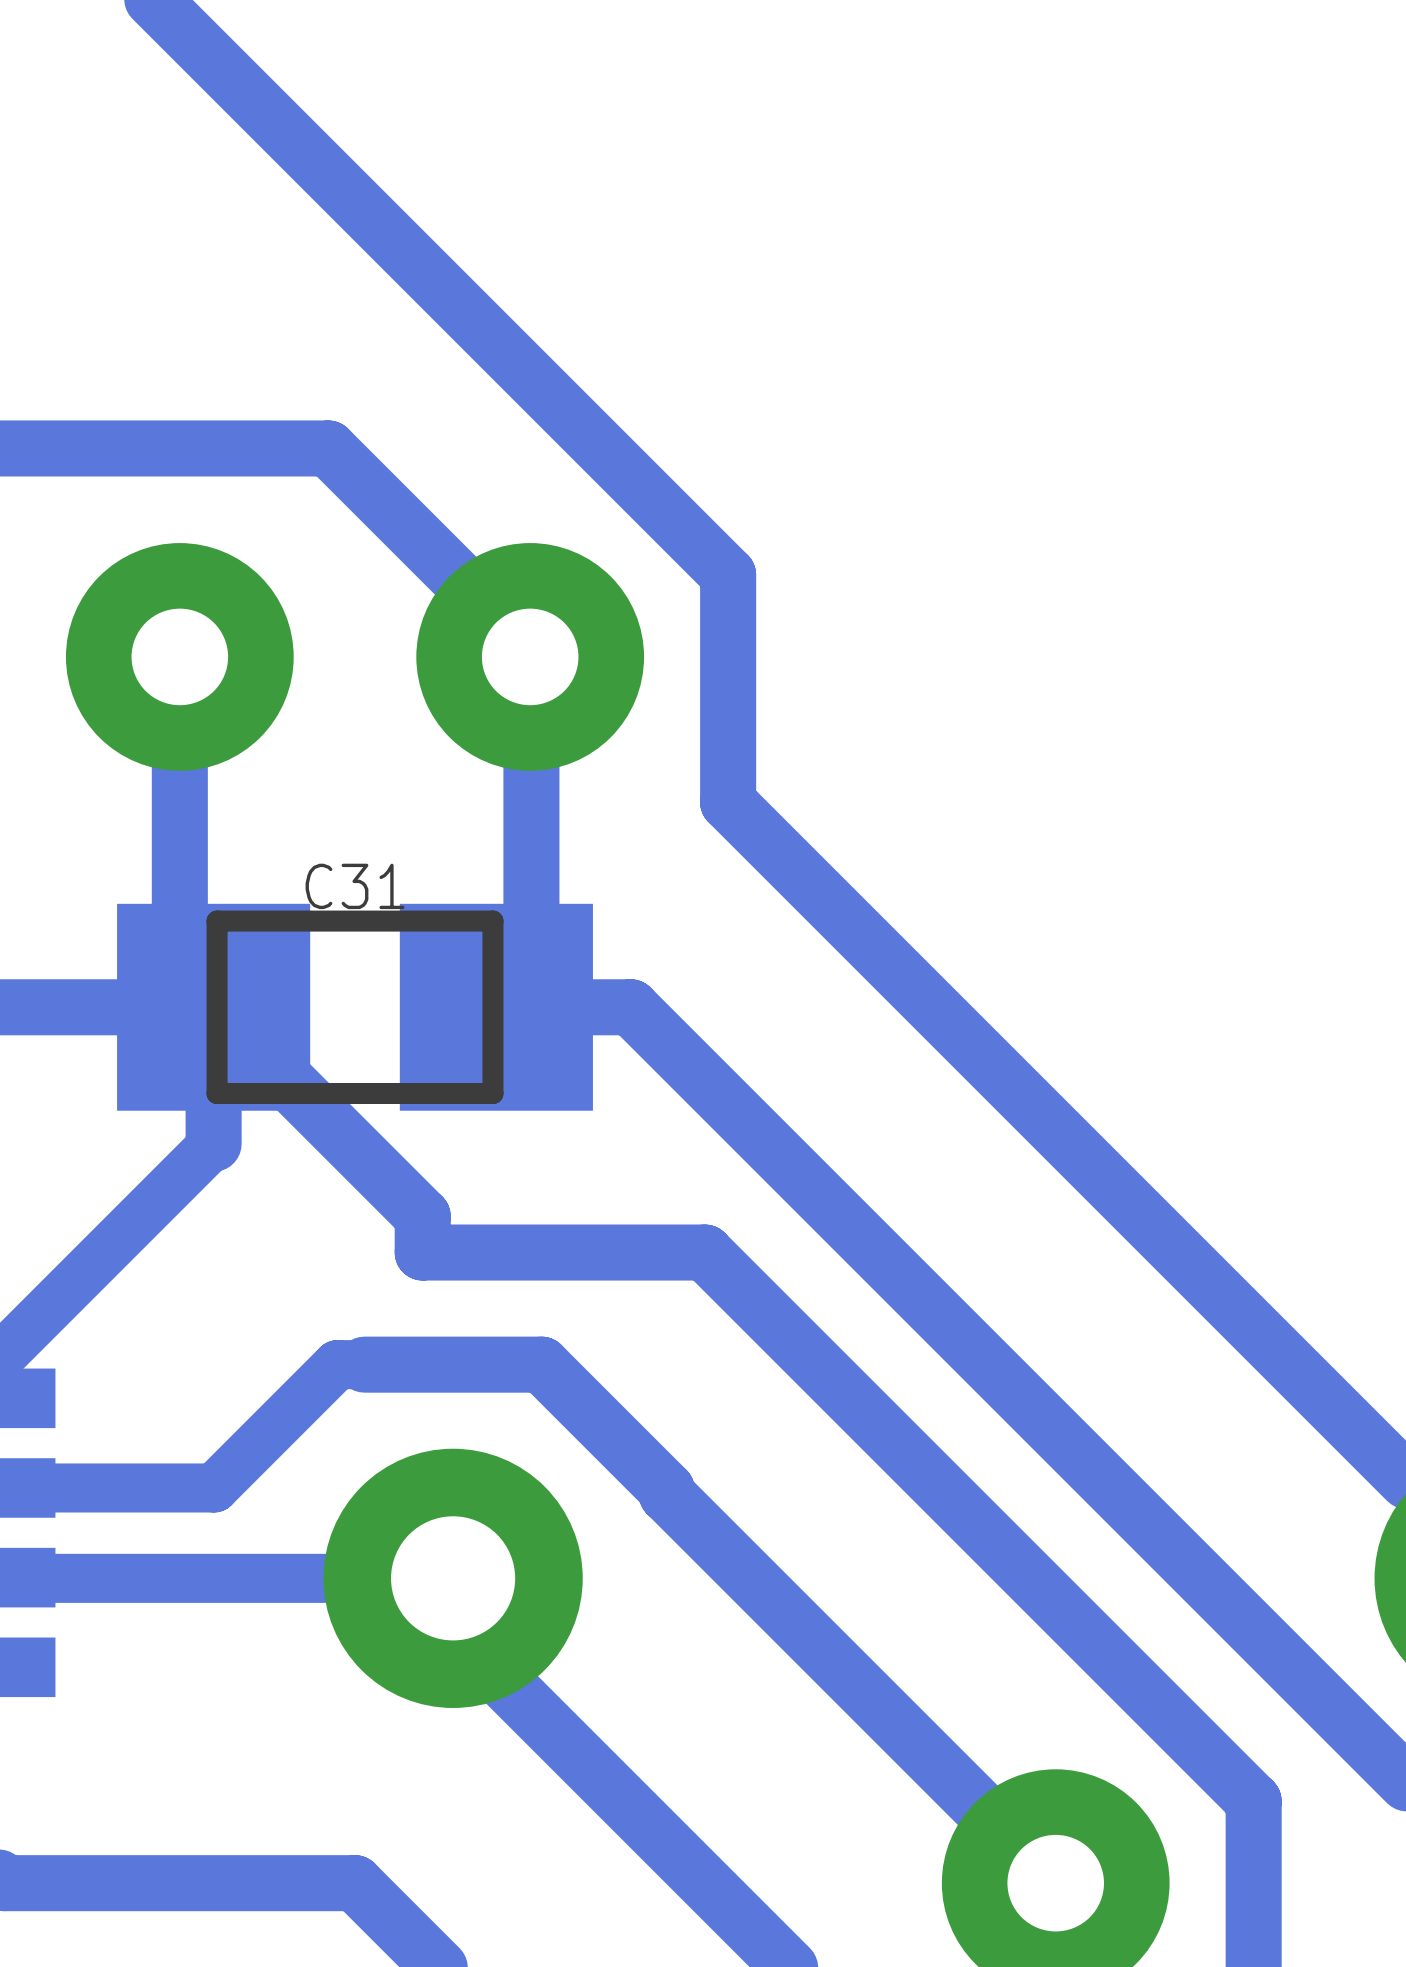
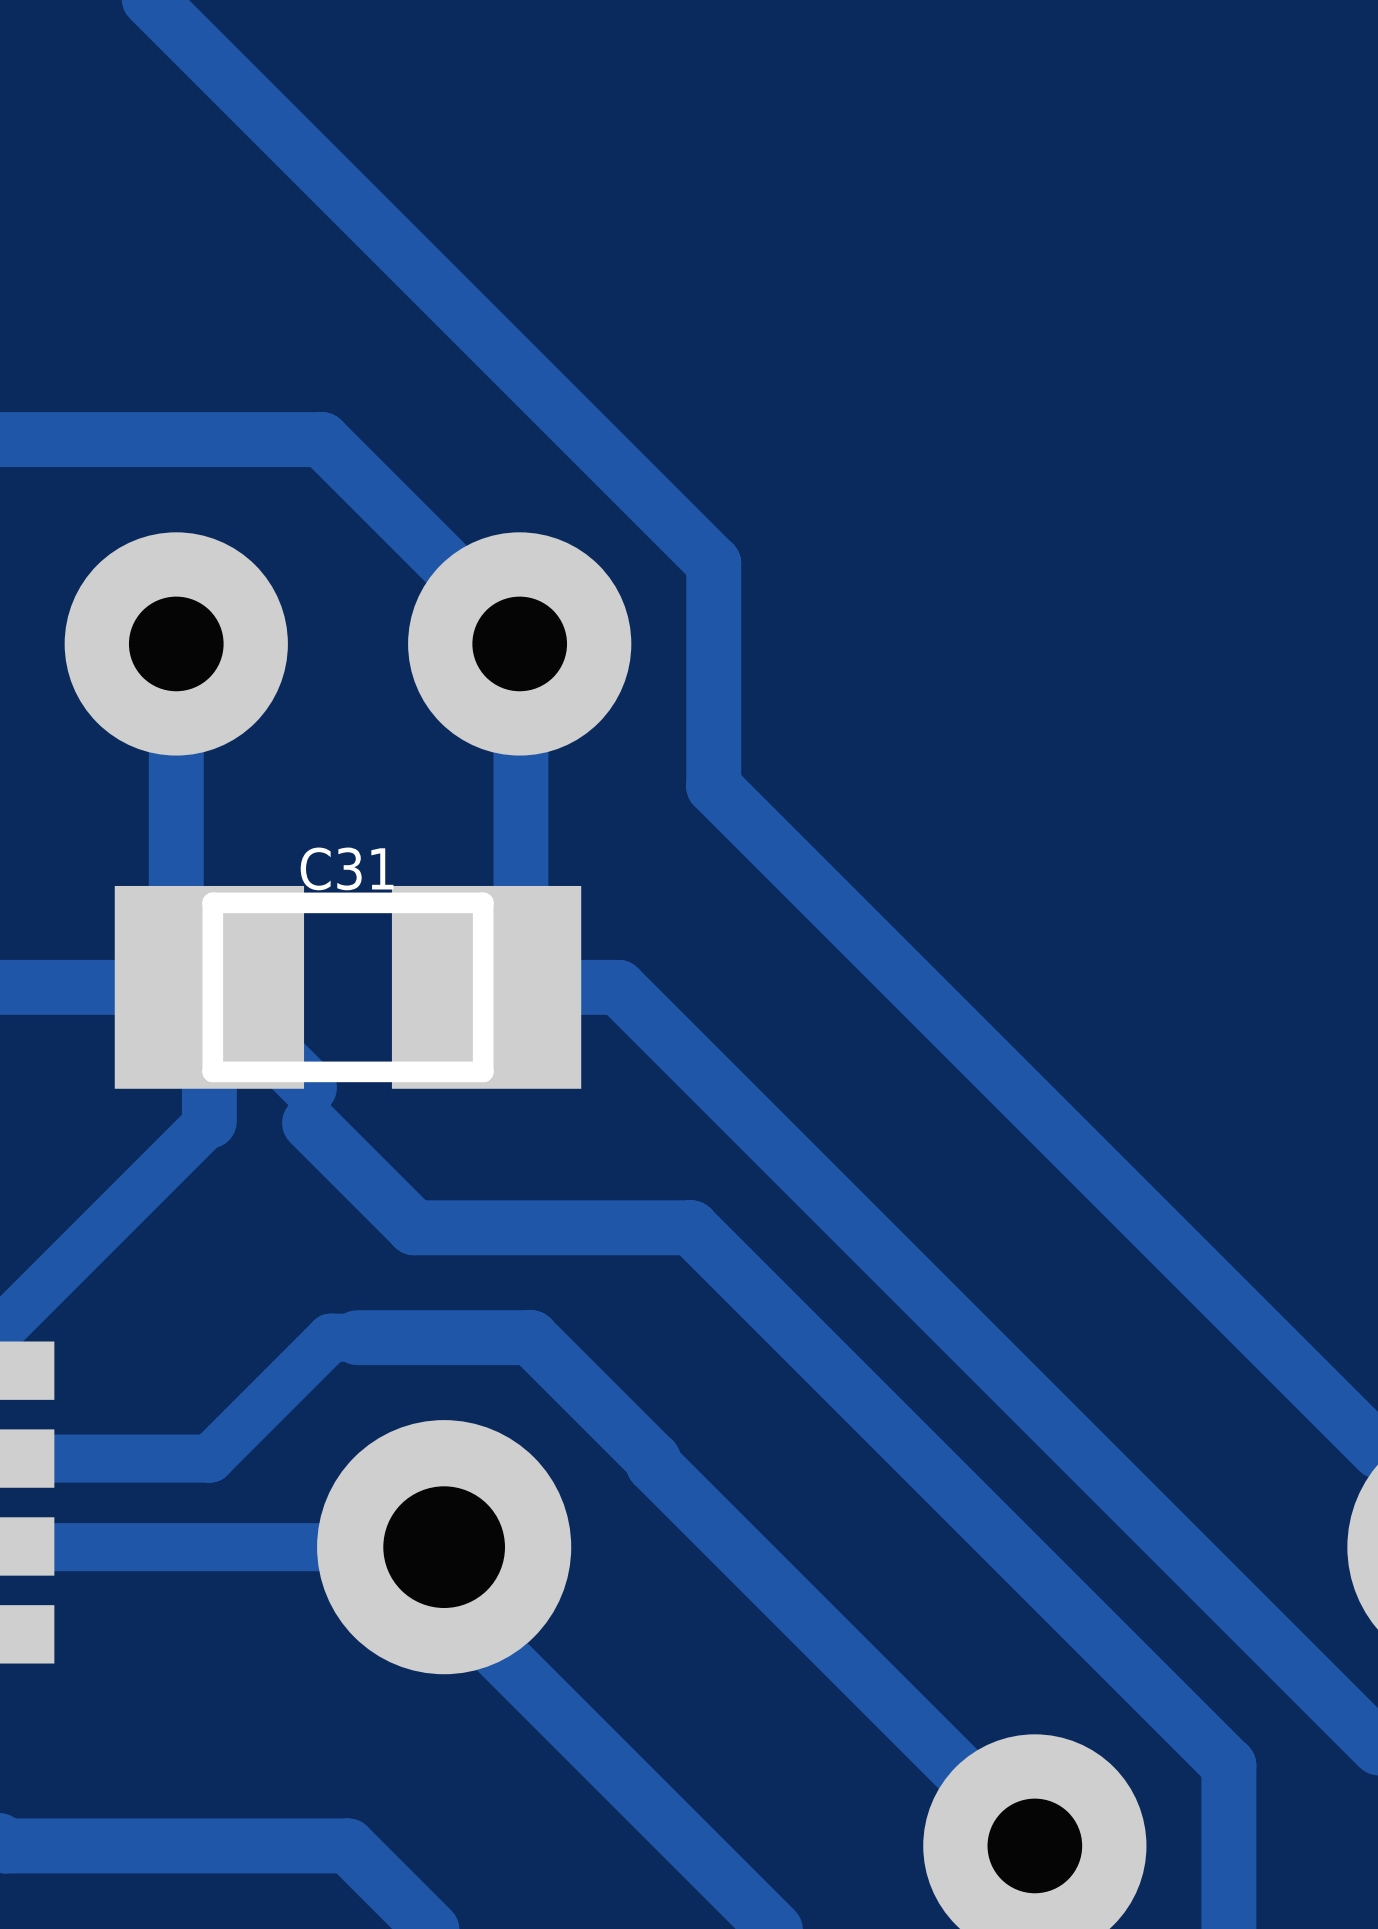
track: (315, 1109) (422, 1216) (422, 1252) -> (309, 1122) (414, 1227)

